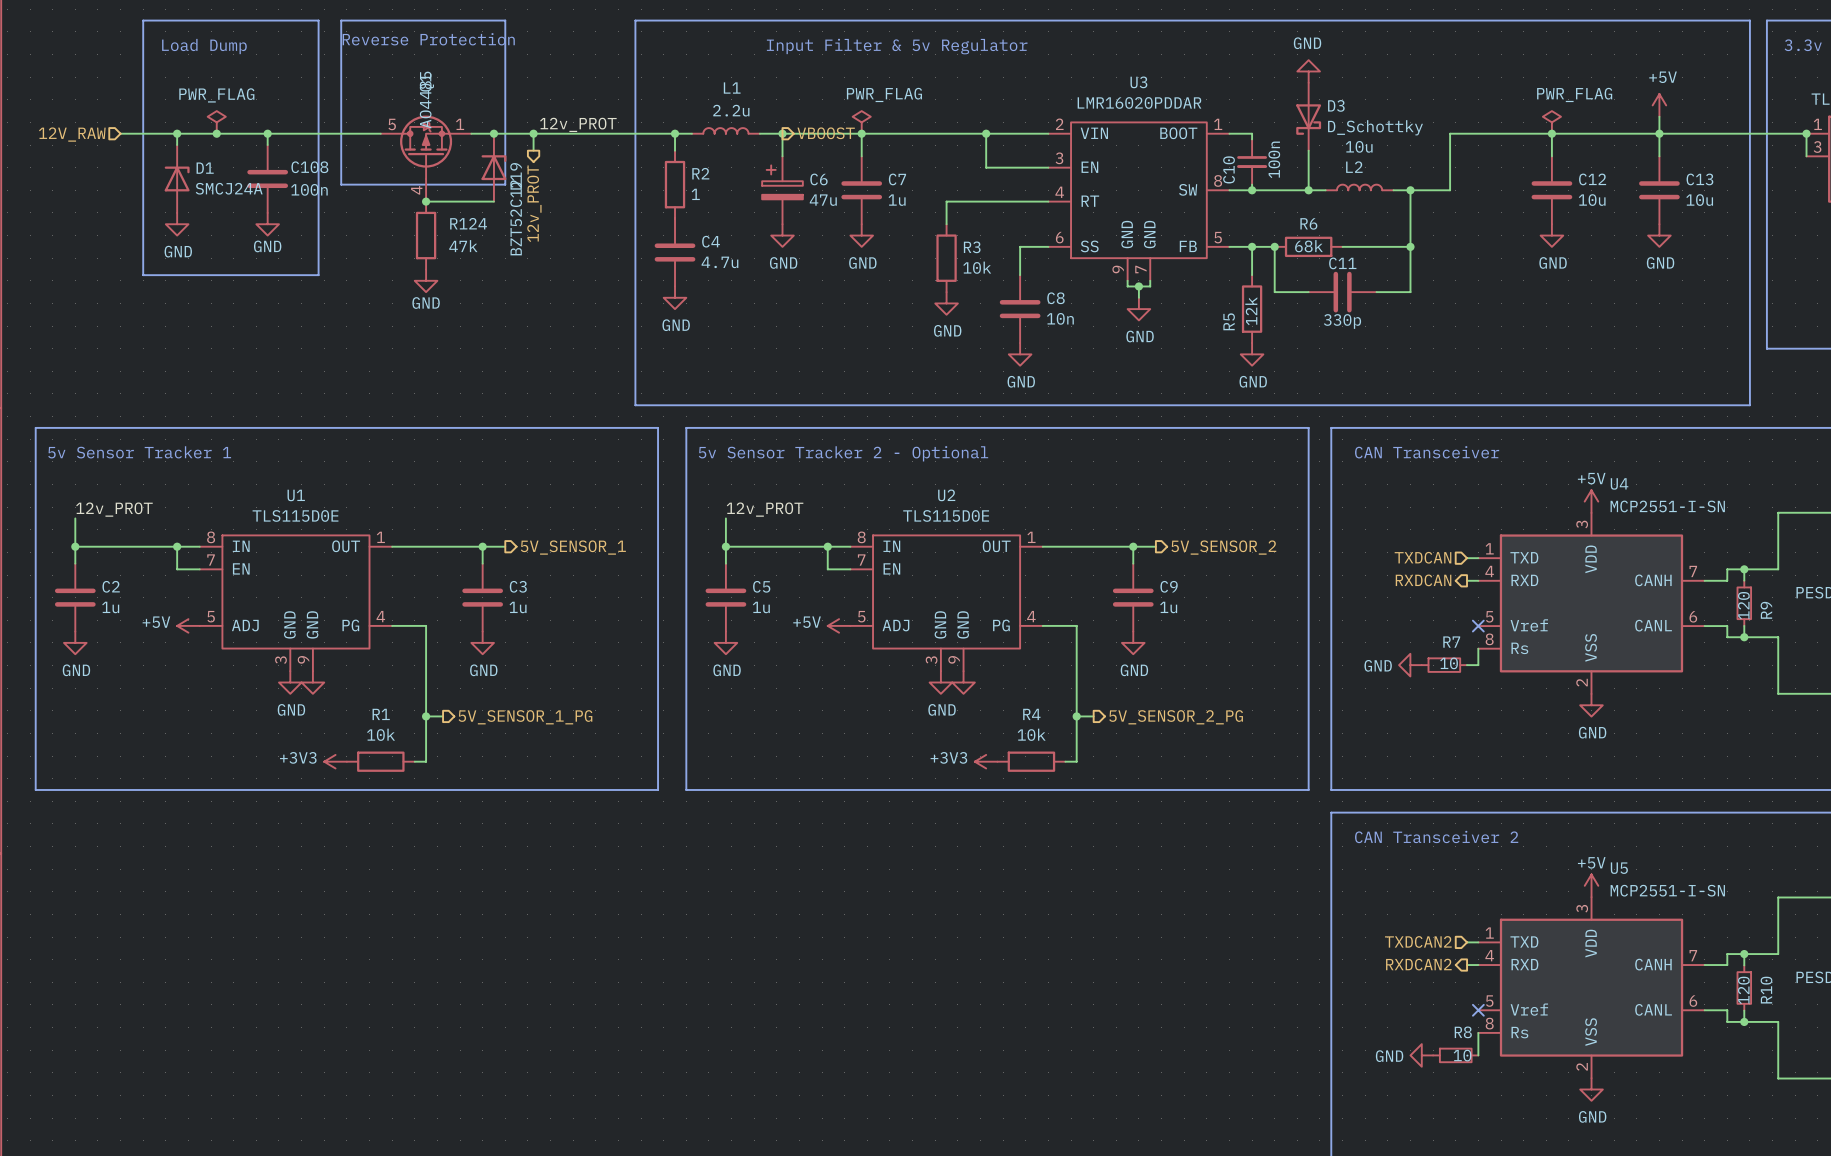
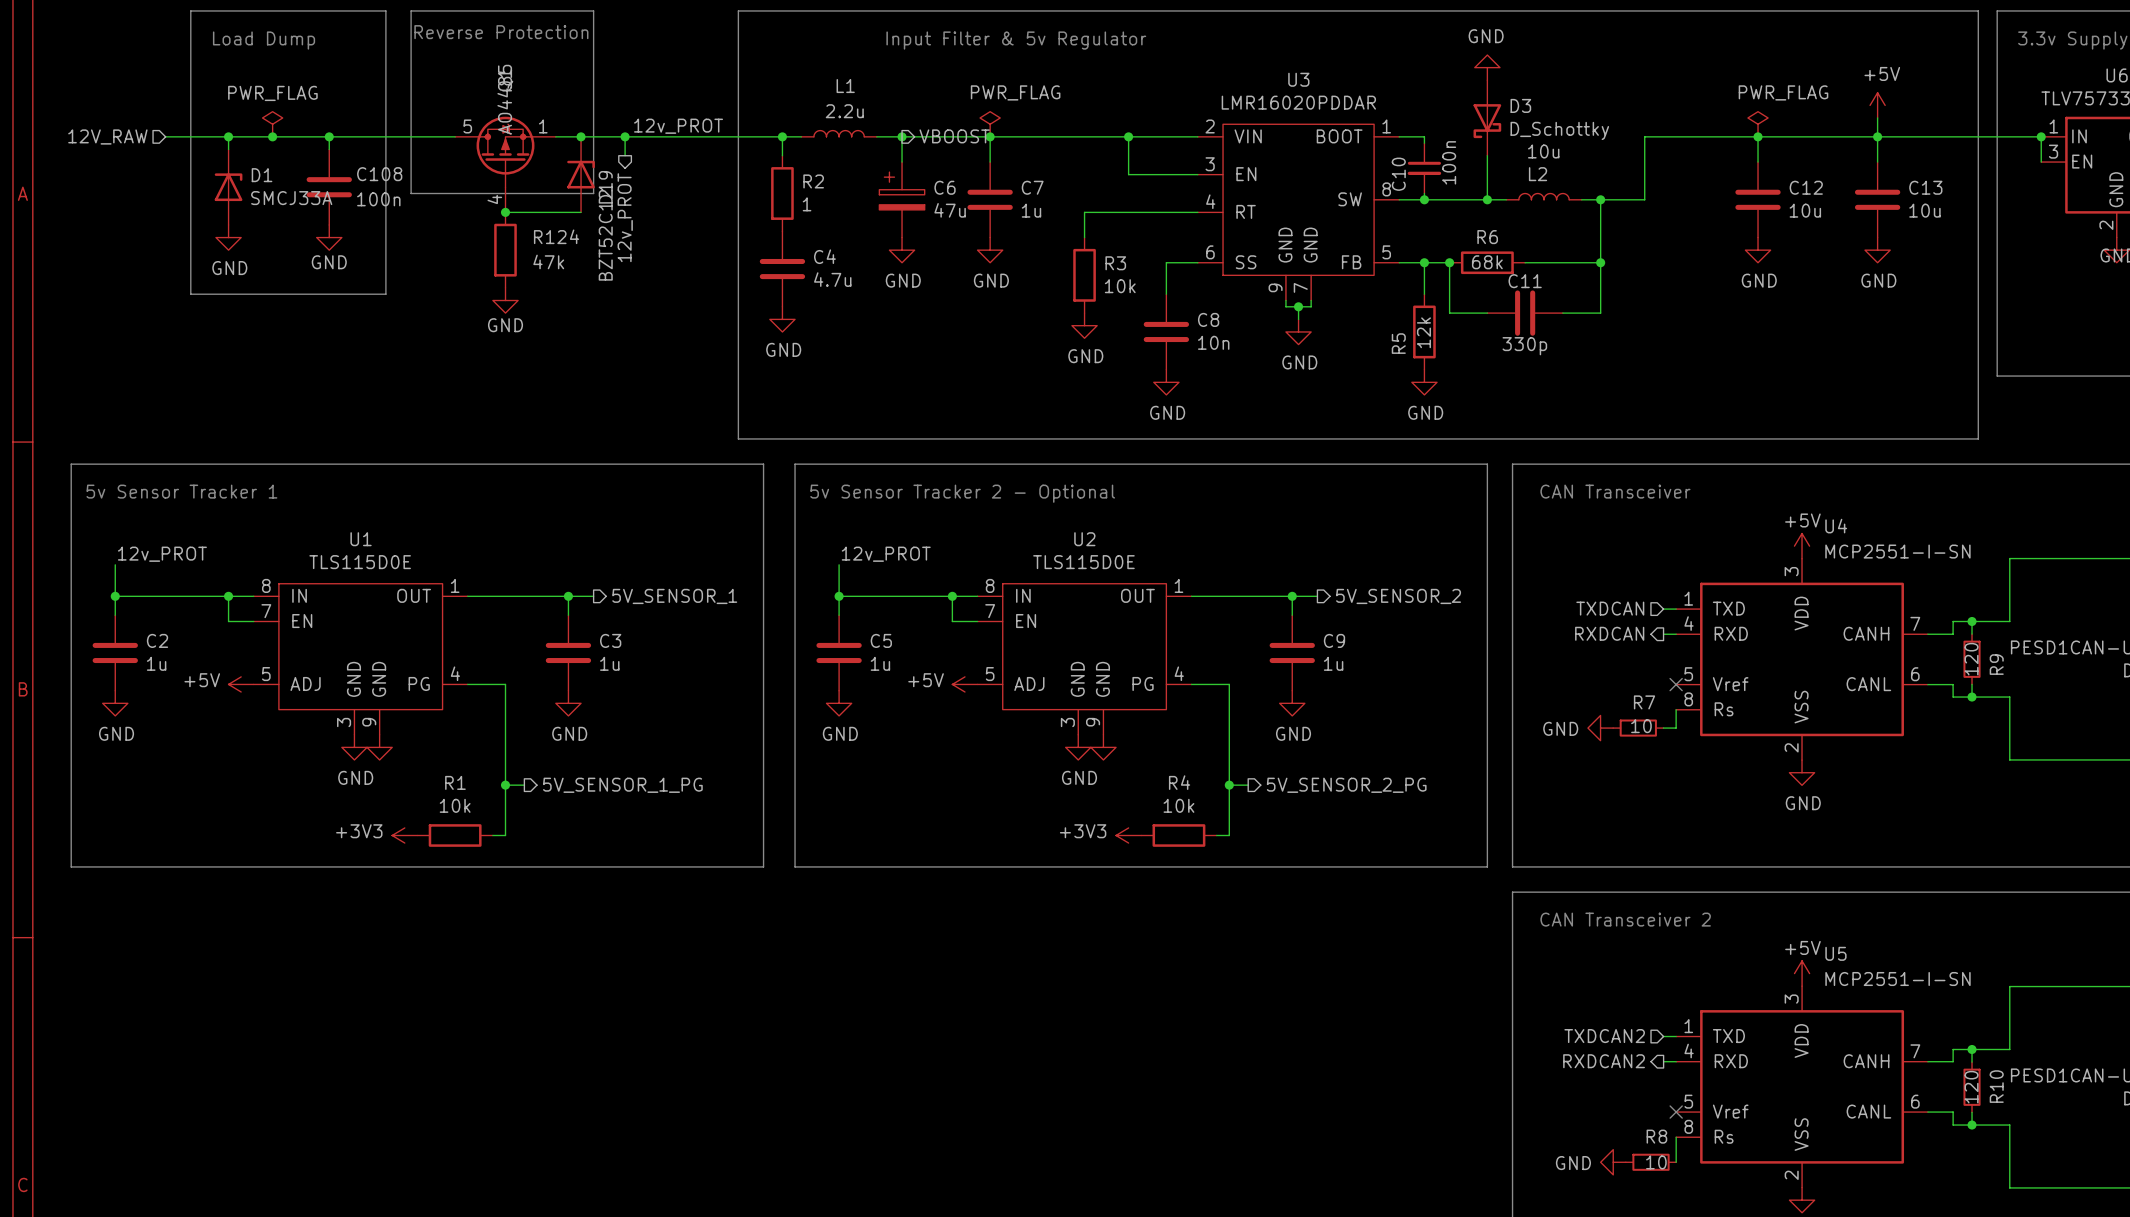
D1 value: SMCJ24A (229, 188) -> SMCJ33A (291, 198)

